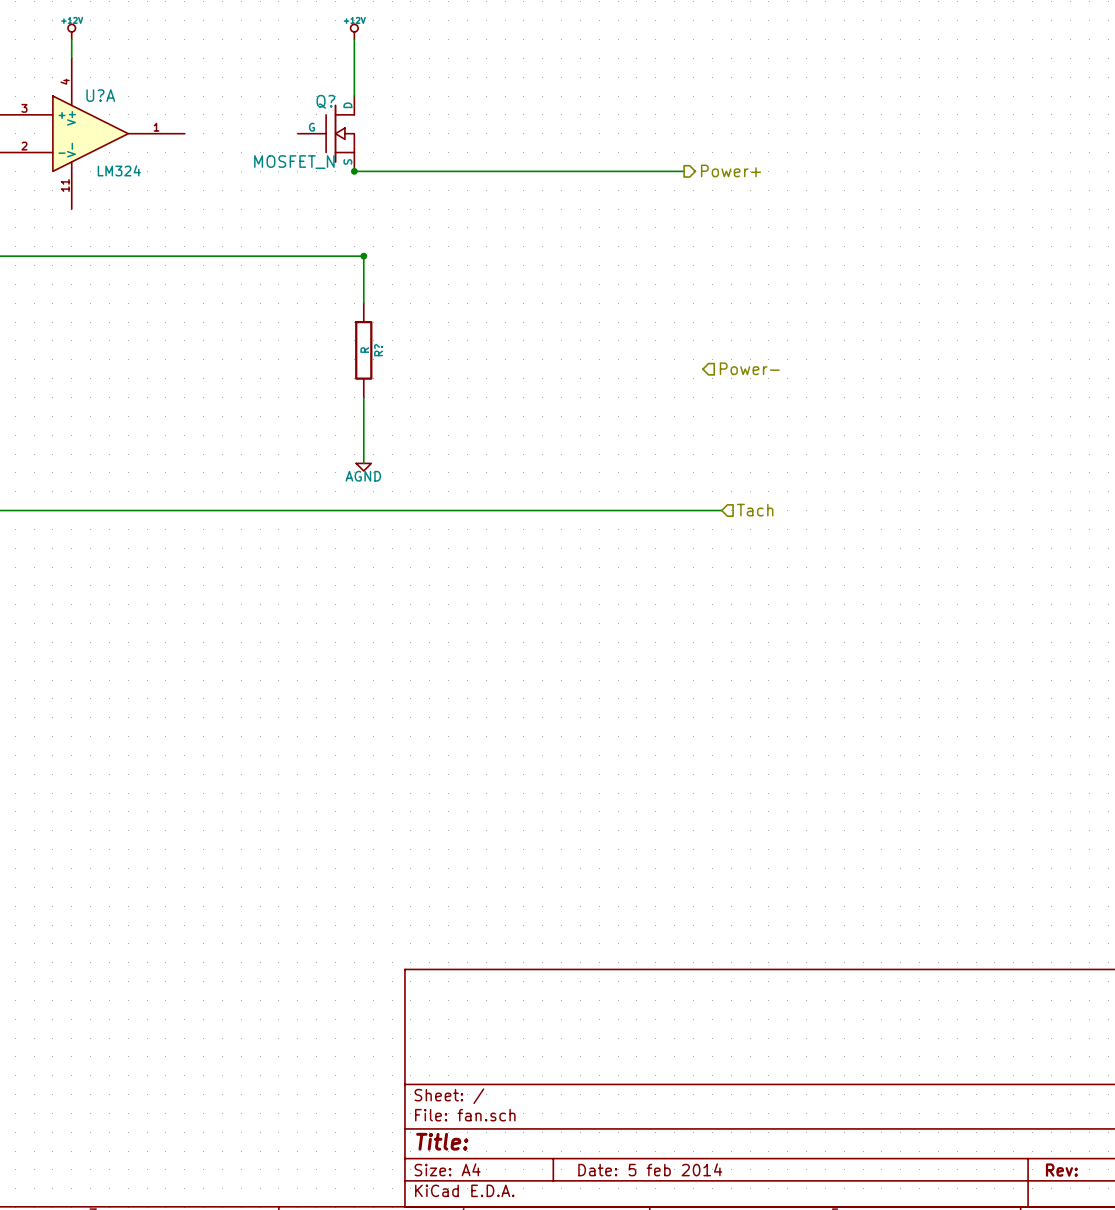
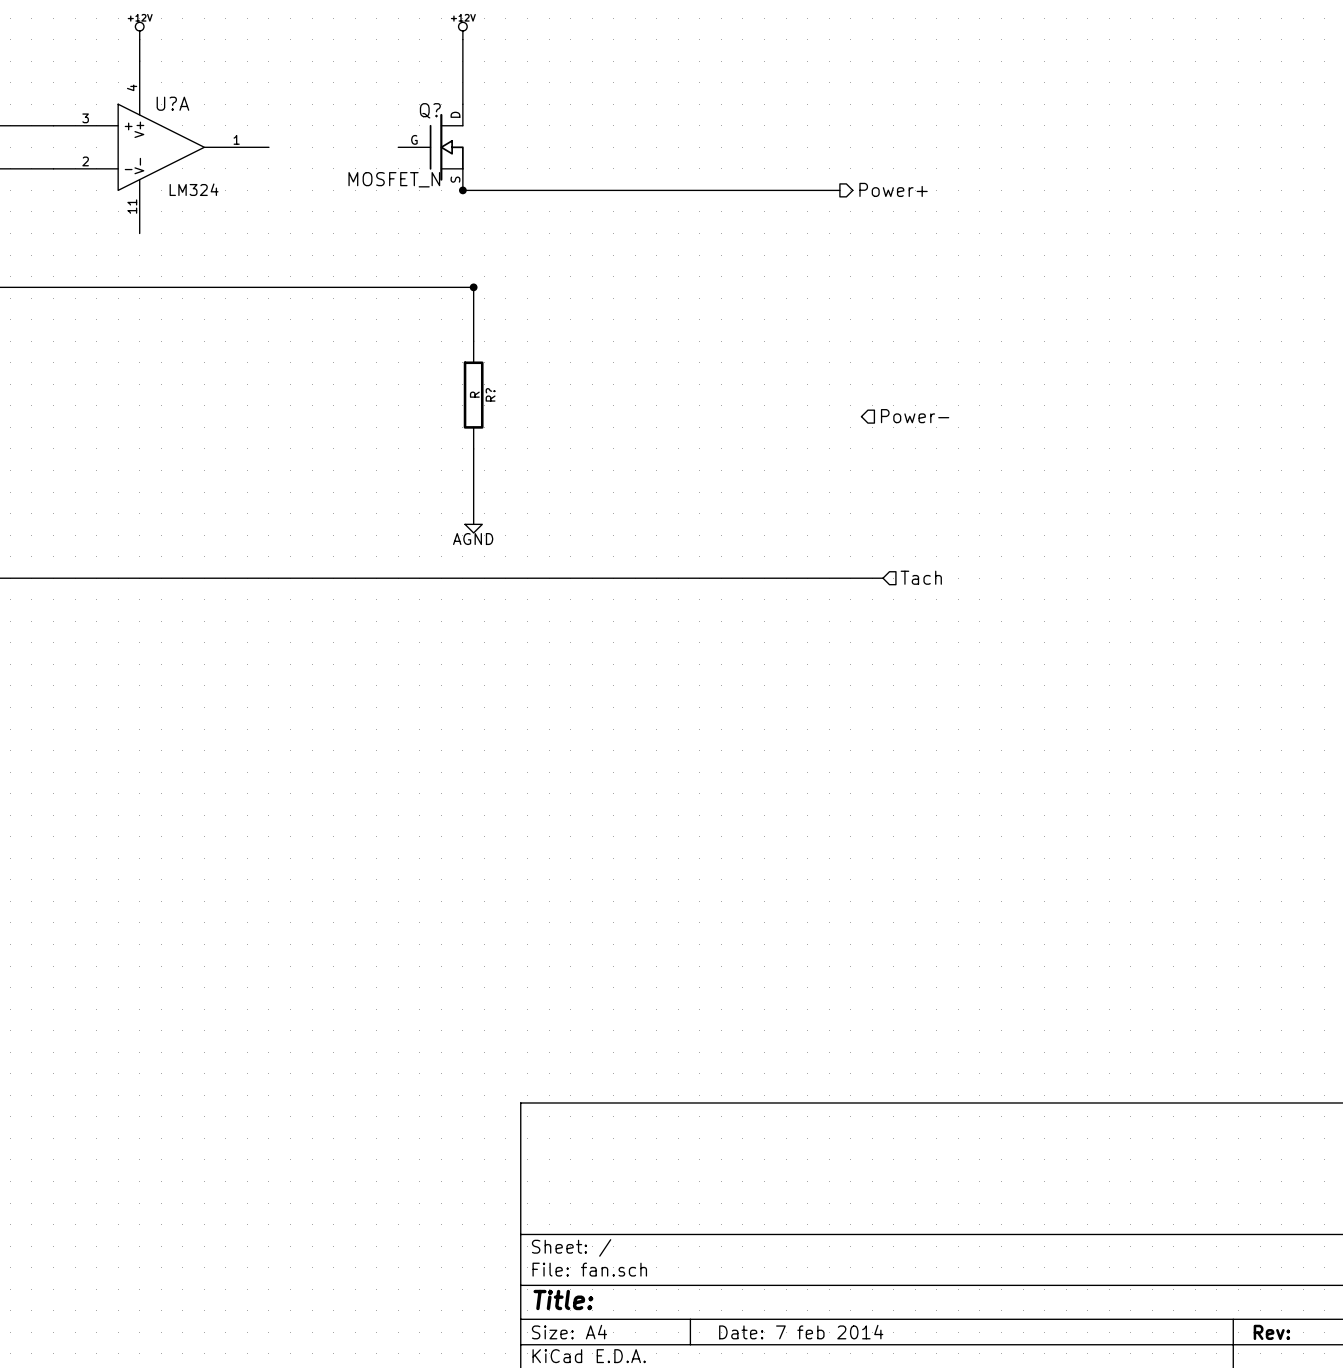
title block: Date: 5 feb 2014 (650, 1169) -> Date: 7 feb 2014 (801, 1332)

